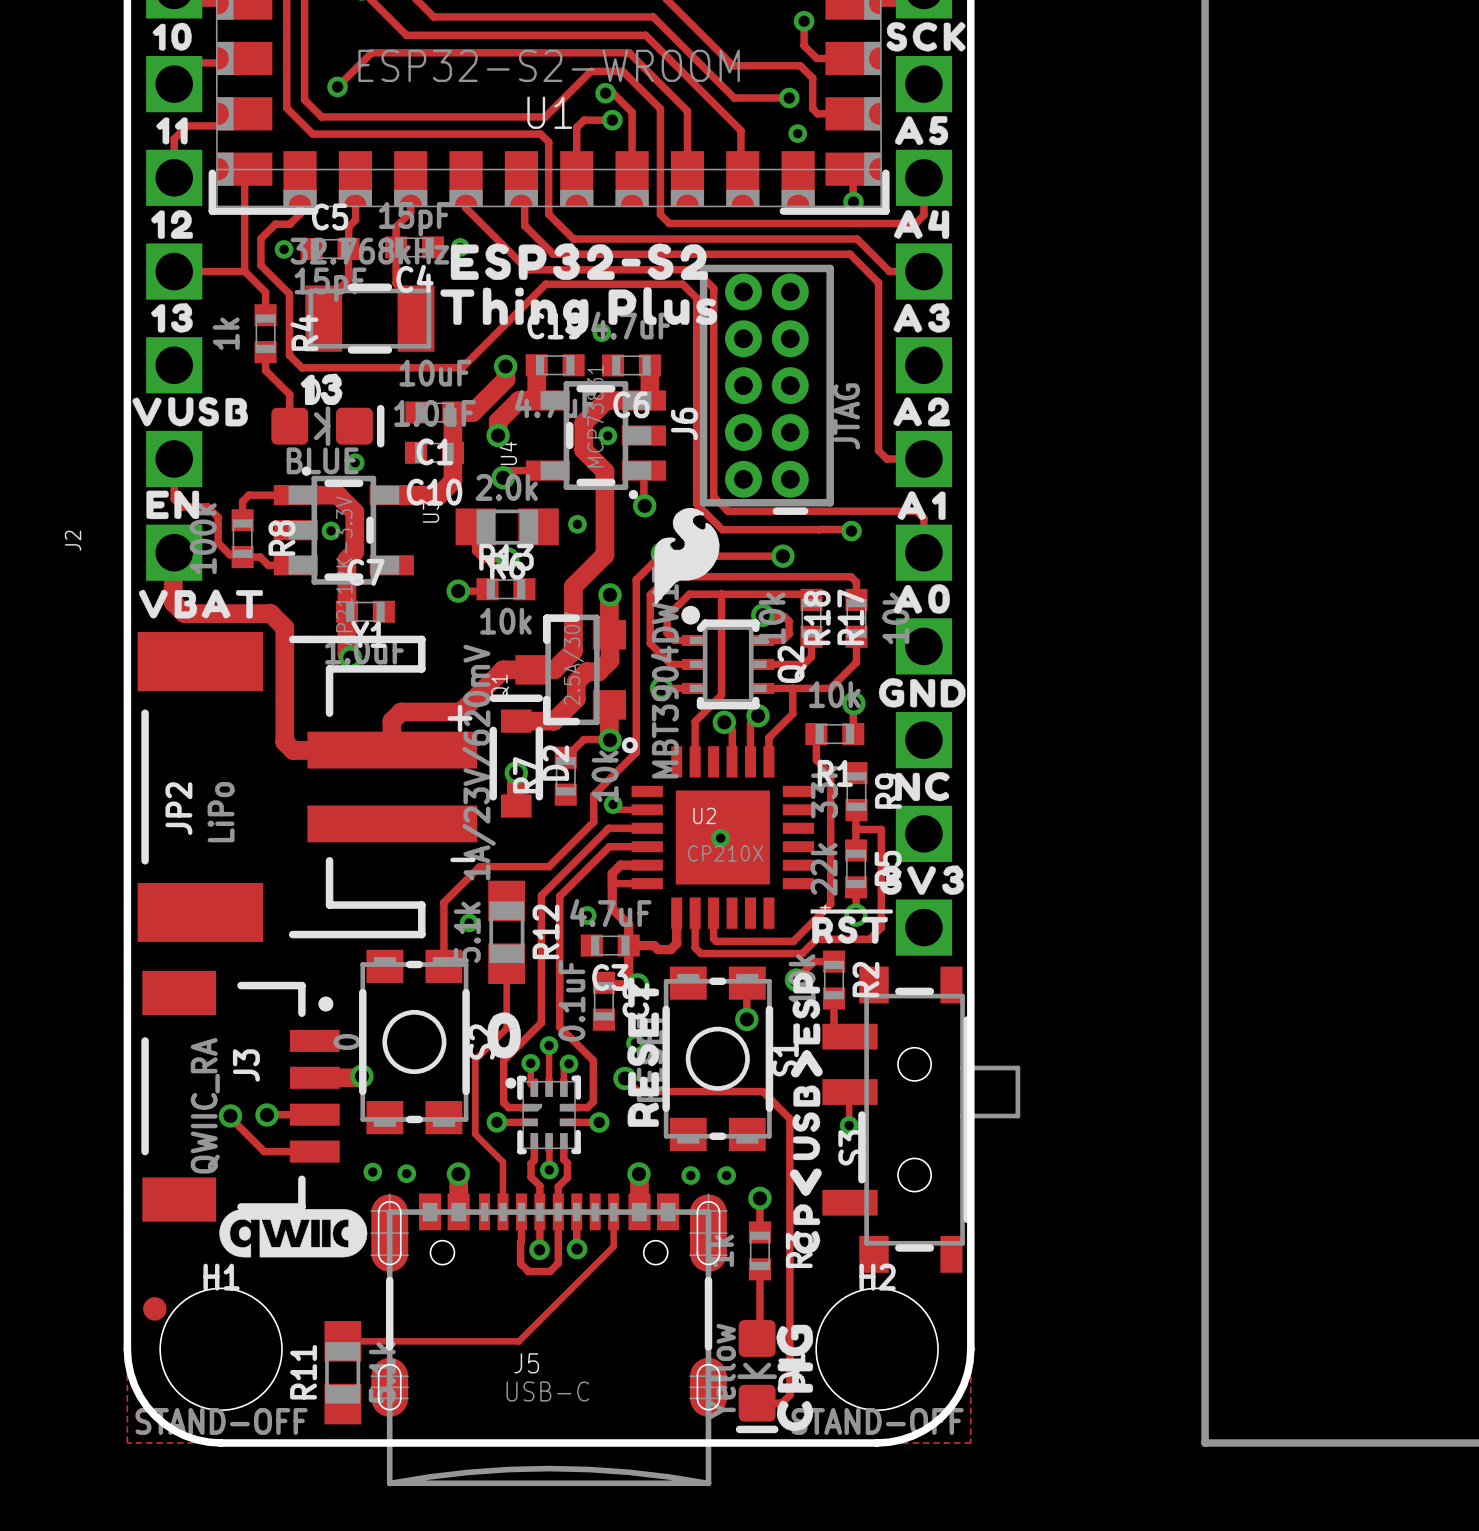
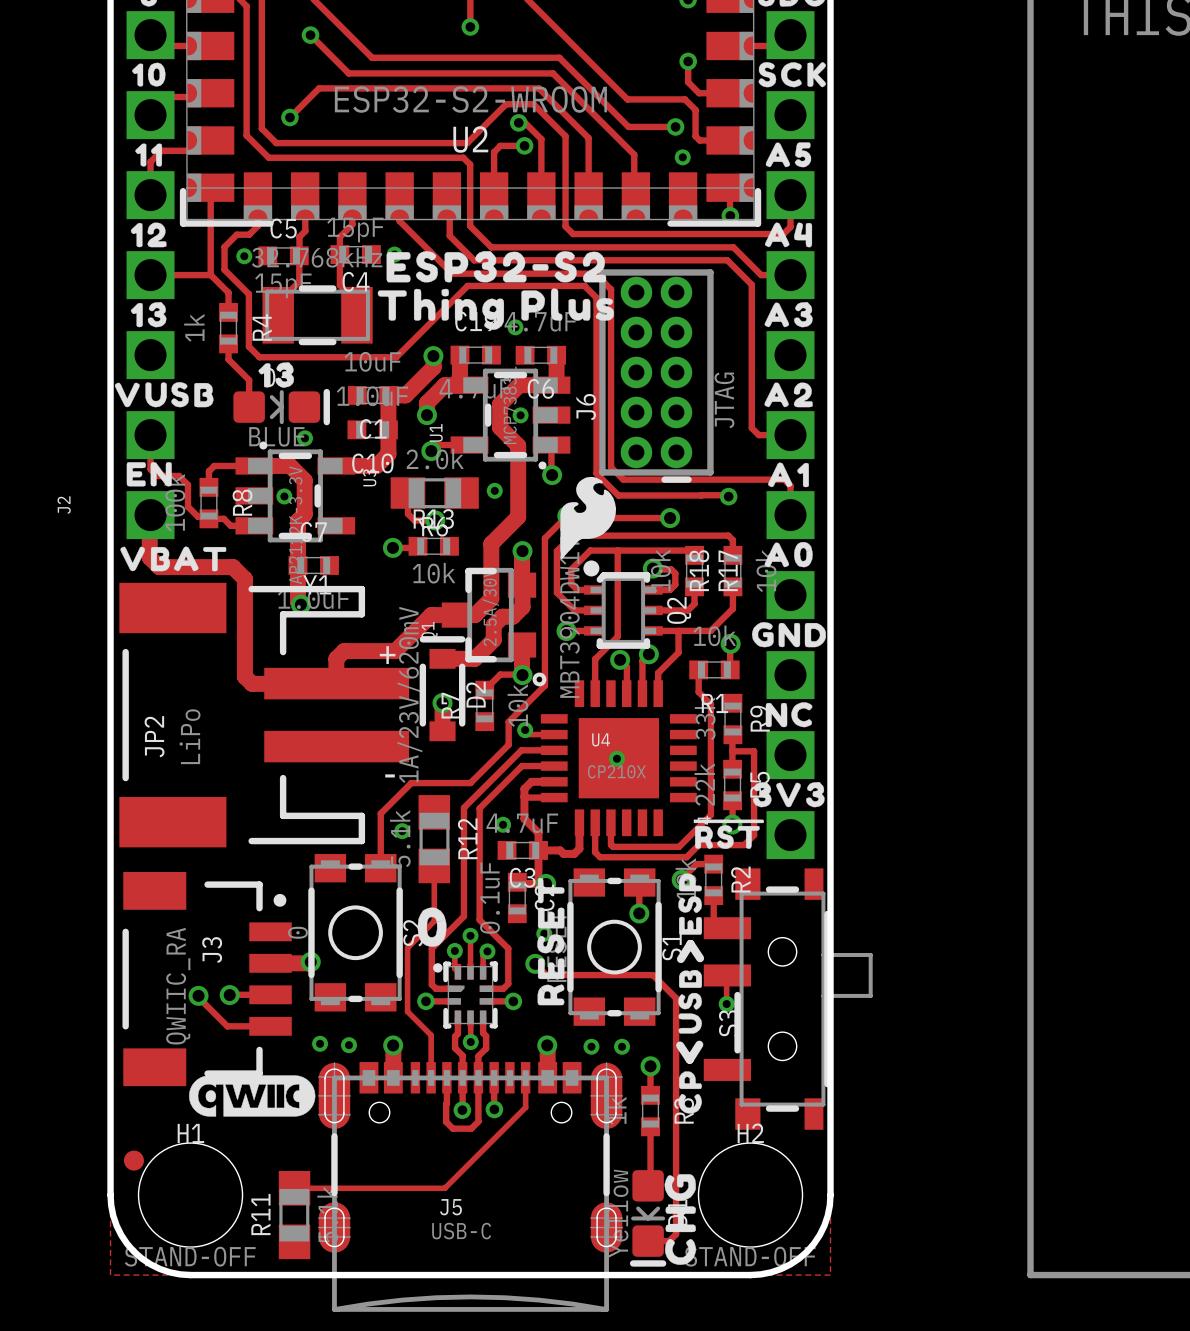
U1 name: U1 (549, 112) -> U2 (470, 139)
U4 name: U4 (508, 453) -> U1 (436, 432)
U2 name: U2 (704, 815) -> U4 (601, 739)

